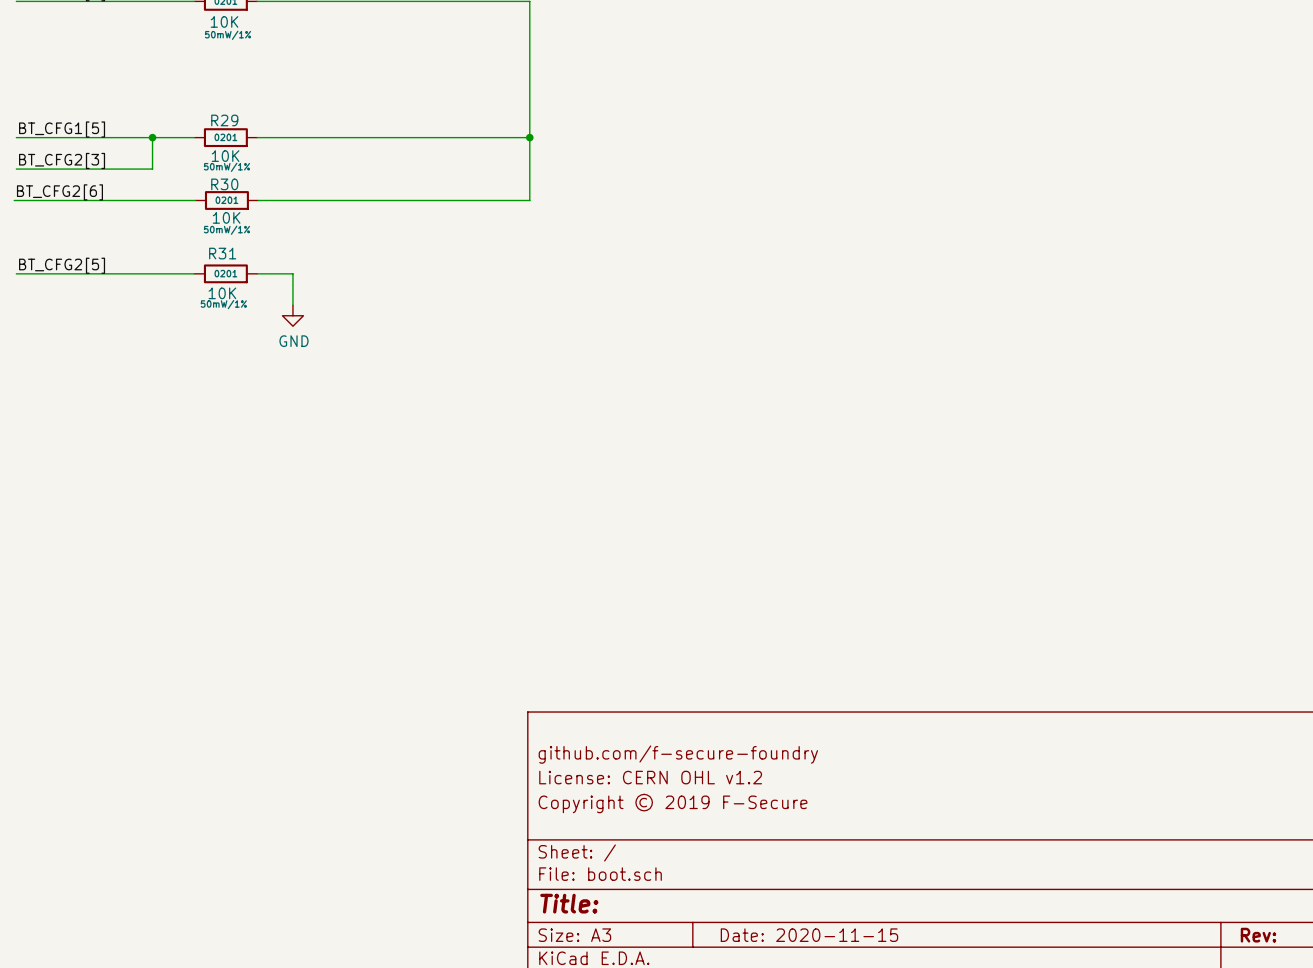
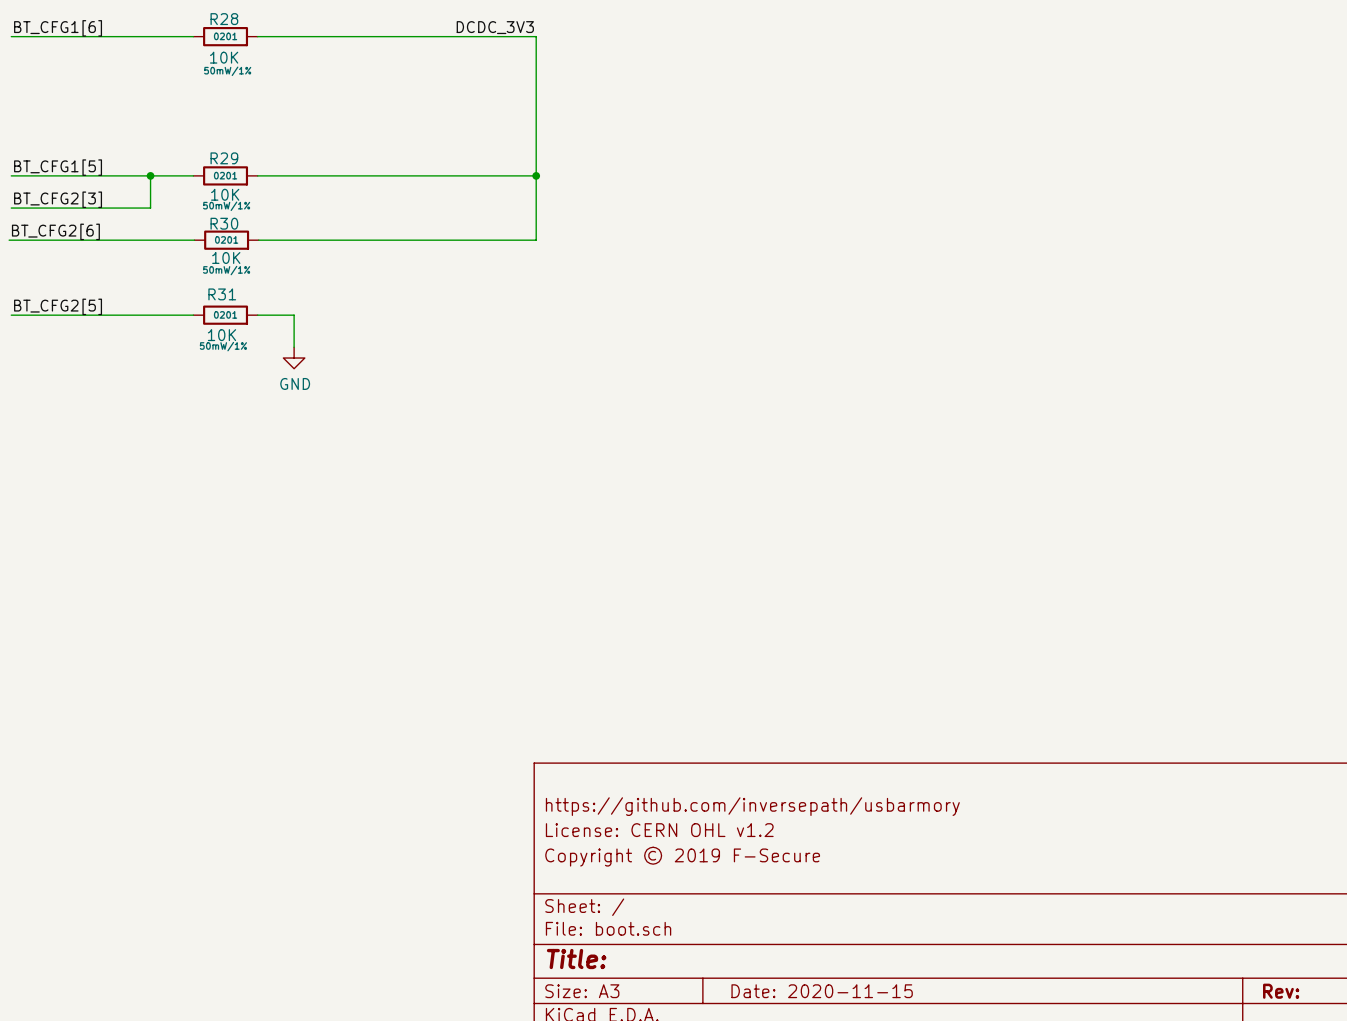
title block: github.com/f-secure-foundry (678, 754) -> https://github.com/inversepath/usbarmory (752, 806)

